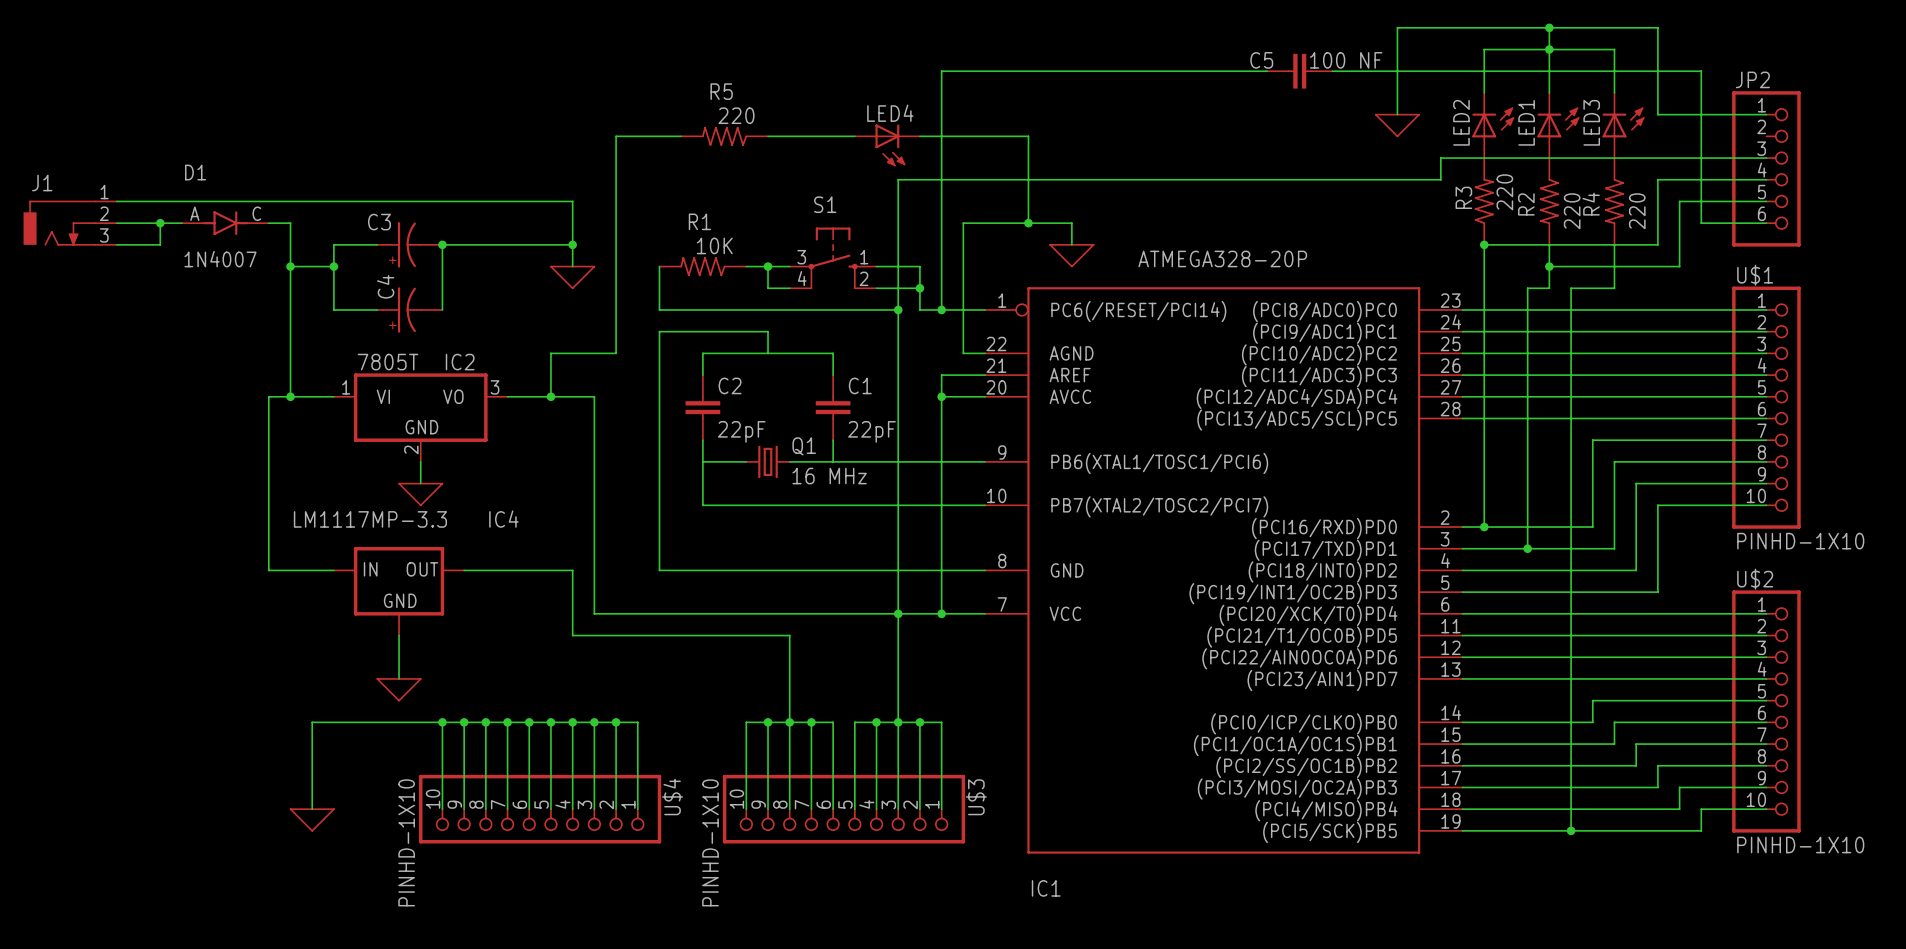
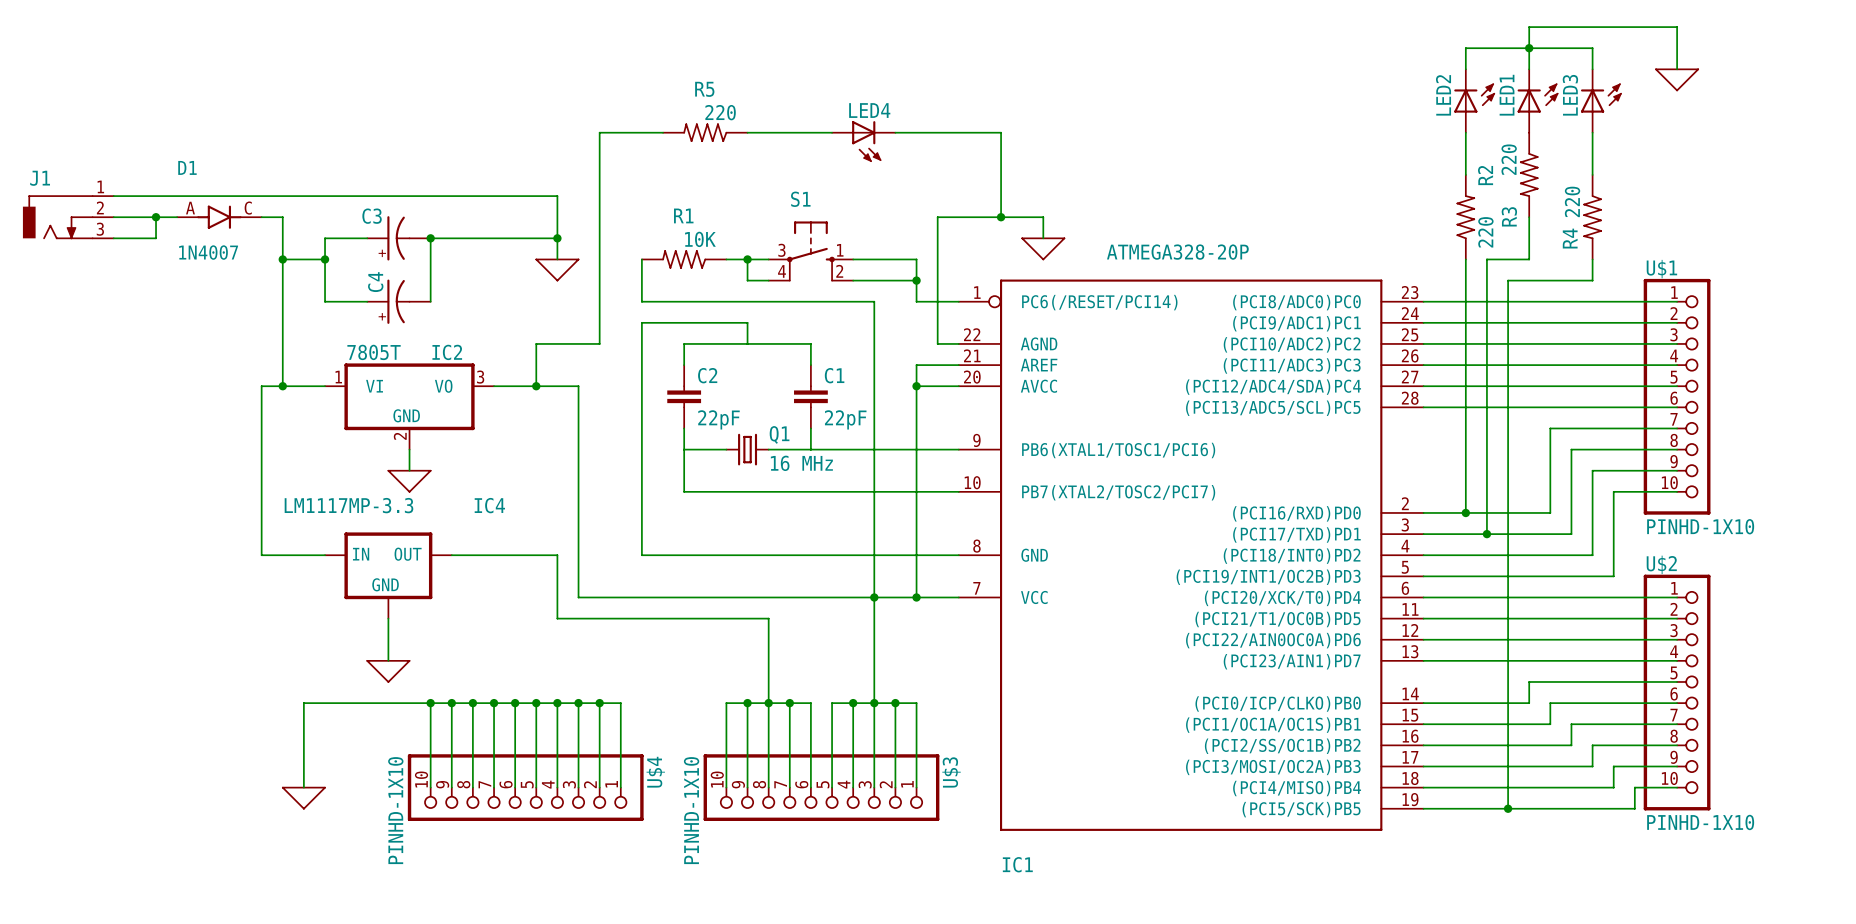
wire: (1549, 27) (1549, 92) -> none
junction: (1549, 27) -> none
wire: (1571, 27) (1397, 27) (1397, 114) -> (1529, 27) (1529, 69)
wire: (1657, 27) (1657, 114) (1766, 114) -> (1613, 27) (1677, 27) (1677, 69)
wire: (1505, 49) (1484, 49) (1484, 92) -> (1465, 48) (1465, 69)
junction: (1549, 49) -> none
junction: none -> (1529, 48)
wire: (1614, 49) (1614, 92) -> (1571, 48) (1592, 48) (1592, 69)
wire: (1267, 71) (941, 71) (941, 266) -> none
C5: 100 NF (1299, 71) -> none
wire: (1332, 71) (1701, 71) (1701, 223) (1766, 223) -> none
power symbol: none -> (1677, 79)
power symbol: (1397, 125) -> none
LED2 position: (1493, 125) -> (1474, 101)
LED1 position: (1558, 125) -> (1537, 101)
LED3 position: (1623, 125) -> (1601, 101)
wire: none -> (1465, 132) (1465, 174)
wire: none -> (1592, 132) (1592, 174)
wire: (1766, 158) (1440, 158) (1440, 179) (898, 179) (898, 309) -> none
JP2: (1766, 168) -> none
wire: (1766, 179) (1657, 179) (1657, 244) (1484, 244) (1484, 527) -> none
R3 value position: 220 (1504, 192) -> 220 (1485, 232)
R3 name position: R3 (1463, 197) -> R3 (1509, 216)
R3 position: (1484, 201) -> (1465, 217)
R2 position: (1549, 201) -> (1529, 174)
R4 position: (1614, 201) -> (1592, 217)
wire: (1766, 201) (1679, 201) (1679, 266) (1571, 266) -> (1529, 217) (1529, 259)
R2 name position: R2 (1526, 204) -> R2 (1485, 175)
R4 name position: R4 (1591, 204) -> R4 (1570, 238)
R2 value position: 220 (1572, 211) -> 220 (1509, 159)
R4 value position: 220 (1637, 211) -> 220 (1572, 201)
junction: (1484, 244) -> none
wire: (1549, 244) (1549, 288) (1527, 288) -> (1508, 259) (1486, 259) (1486, 280)
wire: (1614, 244) (1614, 288) -> (1592, 259) (1592, 280) (1571, 280)
wire: (919, 266) (919, 309) (941, 309) -> (895, 259) (916, 259)
wire: none -> (1465, 259) (1465, 512)
junction: (1549, 266) -> none
wire: none -> (895, 280) (916, 280)
junction: (919, 288) -> none
junction: none -> (916, 280)
wire: (1571, 288) (1571, 700) -> (1529, 280) (1508, 280) (1508, 808)
junction: (898, 309) -> none
junction: (941, 309) -> none
wire: (1723, 309) (1766, 309) -> none
wire: (1723, 331) (1766, 331) -> none
wire: (1723, 353) (1766, 353) -> none
wire: (1723, 375) (1766, 375) -> none
wire: (1723, 396) (1766, 396) -> none
U$1 position: (1766, 407) -> (1677, 396)
wire: (1723, 418) (1766, 418) -> none
wire: (1723, 440) (1766, 440) -> none
wire: (1723, 461) (1766, 461) -> none
wire: (1723, 483) (1766, 483) -> none
wire: (1723, 505) (1766, 505) -> none
junction position: (1484, 527) -> (1465, 512)
wire: (1723, 613) (1766, 613) -> none
wire: (1723, 635) (1766, 635) -> none
wire: (1723, 657) (1766, 657) -> none
wire: (1723, 678) (1766, 678) -> none
wire: (1592, 700) (1592, 722) (1571, 722) (1571, 830) -> (1550, 681) (1529, 681)
wire: (1723, 700) (1766, 700) -> none
U$2 position: (1766, 711) -> (1677, 692)
wire: (1614, 722) (1614, 744) (1592, 744) -> (1571, 703) (1550, 703) (1550, 724)
wire: (1723, 722) (1766, 722) -> none
wire: (1636, 744) (1636, 765) (1614, 765) -> (1592, 724) (1571, 724) (1571, 745)
wire: (1723, 744) (1766, 744) -> none
wire: (1657, 765) (1657, 787) (1636, 787) -> (1613, 745) (1592, 745) (1592, 766)
wire: (1723, 765) (1766, 765) -> none
wire: (1679, 787) (1679, 809) (1657, 809) -> (1634, 766) (1613, 766) (1613, 787)
wire: (1723, 787) (1766, 787) -> none
wire: (1701, 809) (1701, 830) (1679, 830) -> (1655, 787) (1634, 787) (1634, 808)
wire: (1723, 809) (1766, 809) -> none
junction position: (1571, 830) -> (1508, 808)

